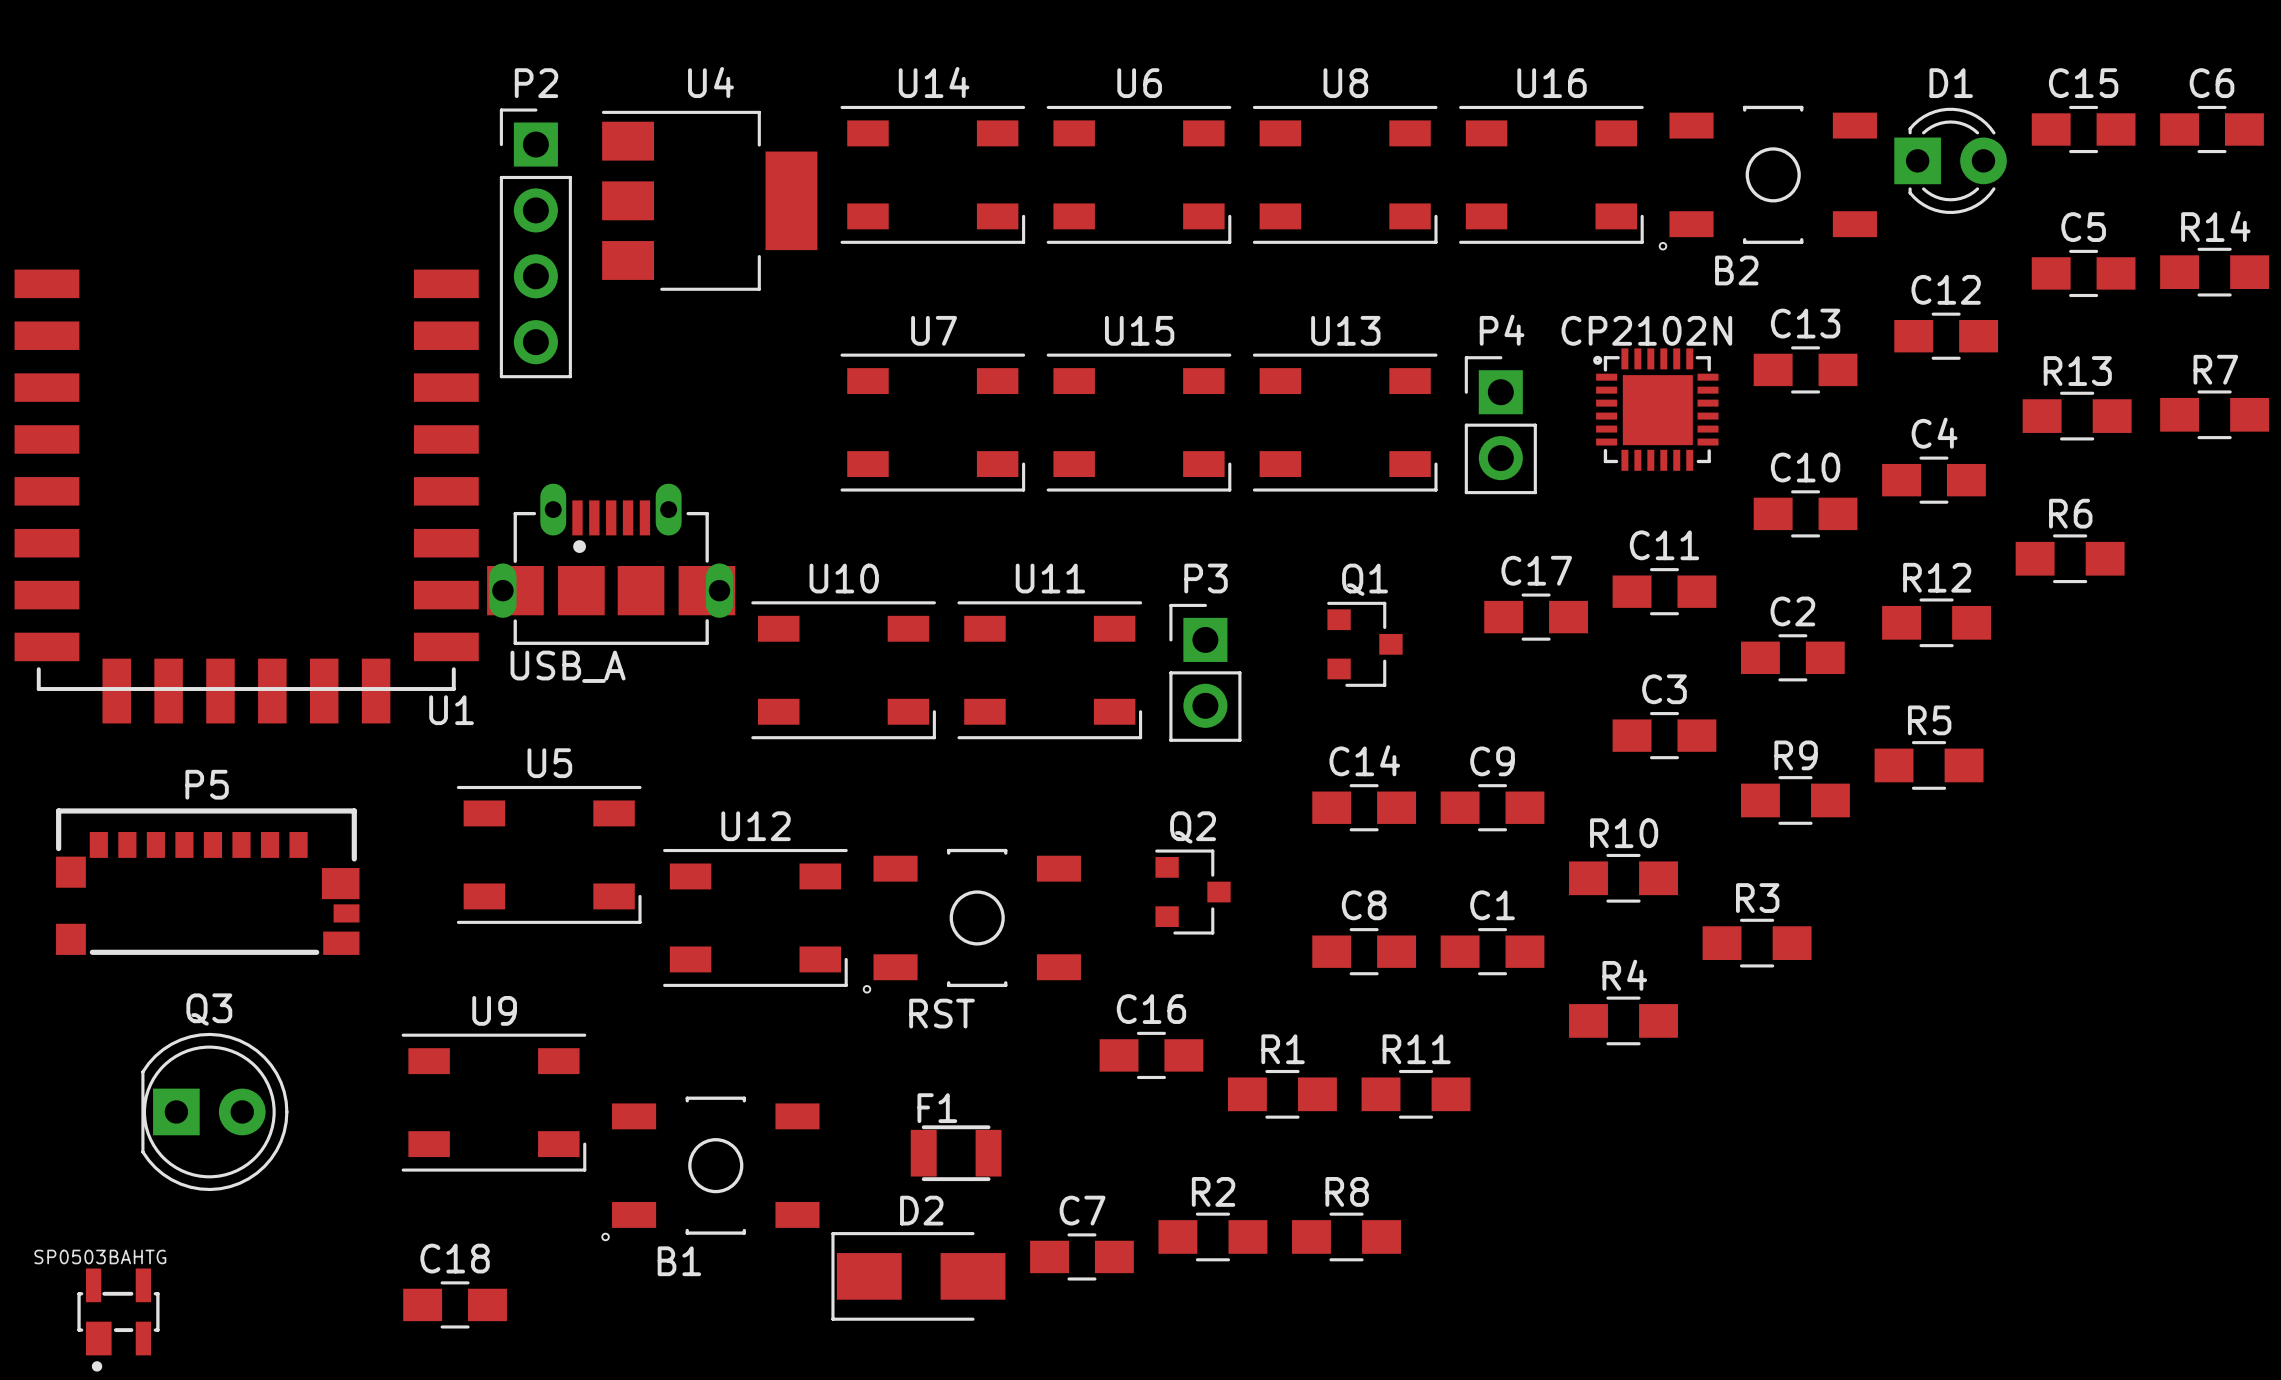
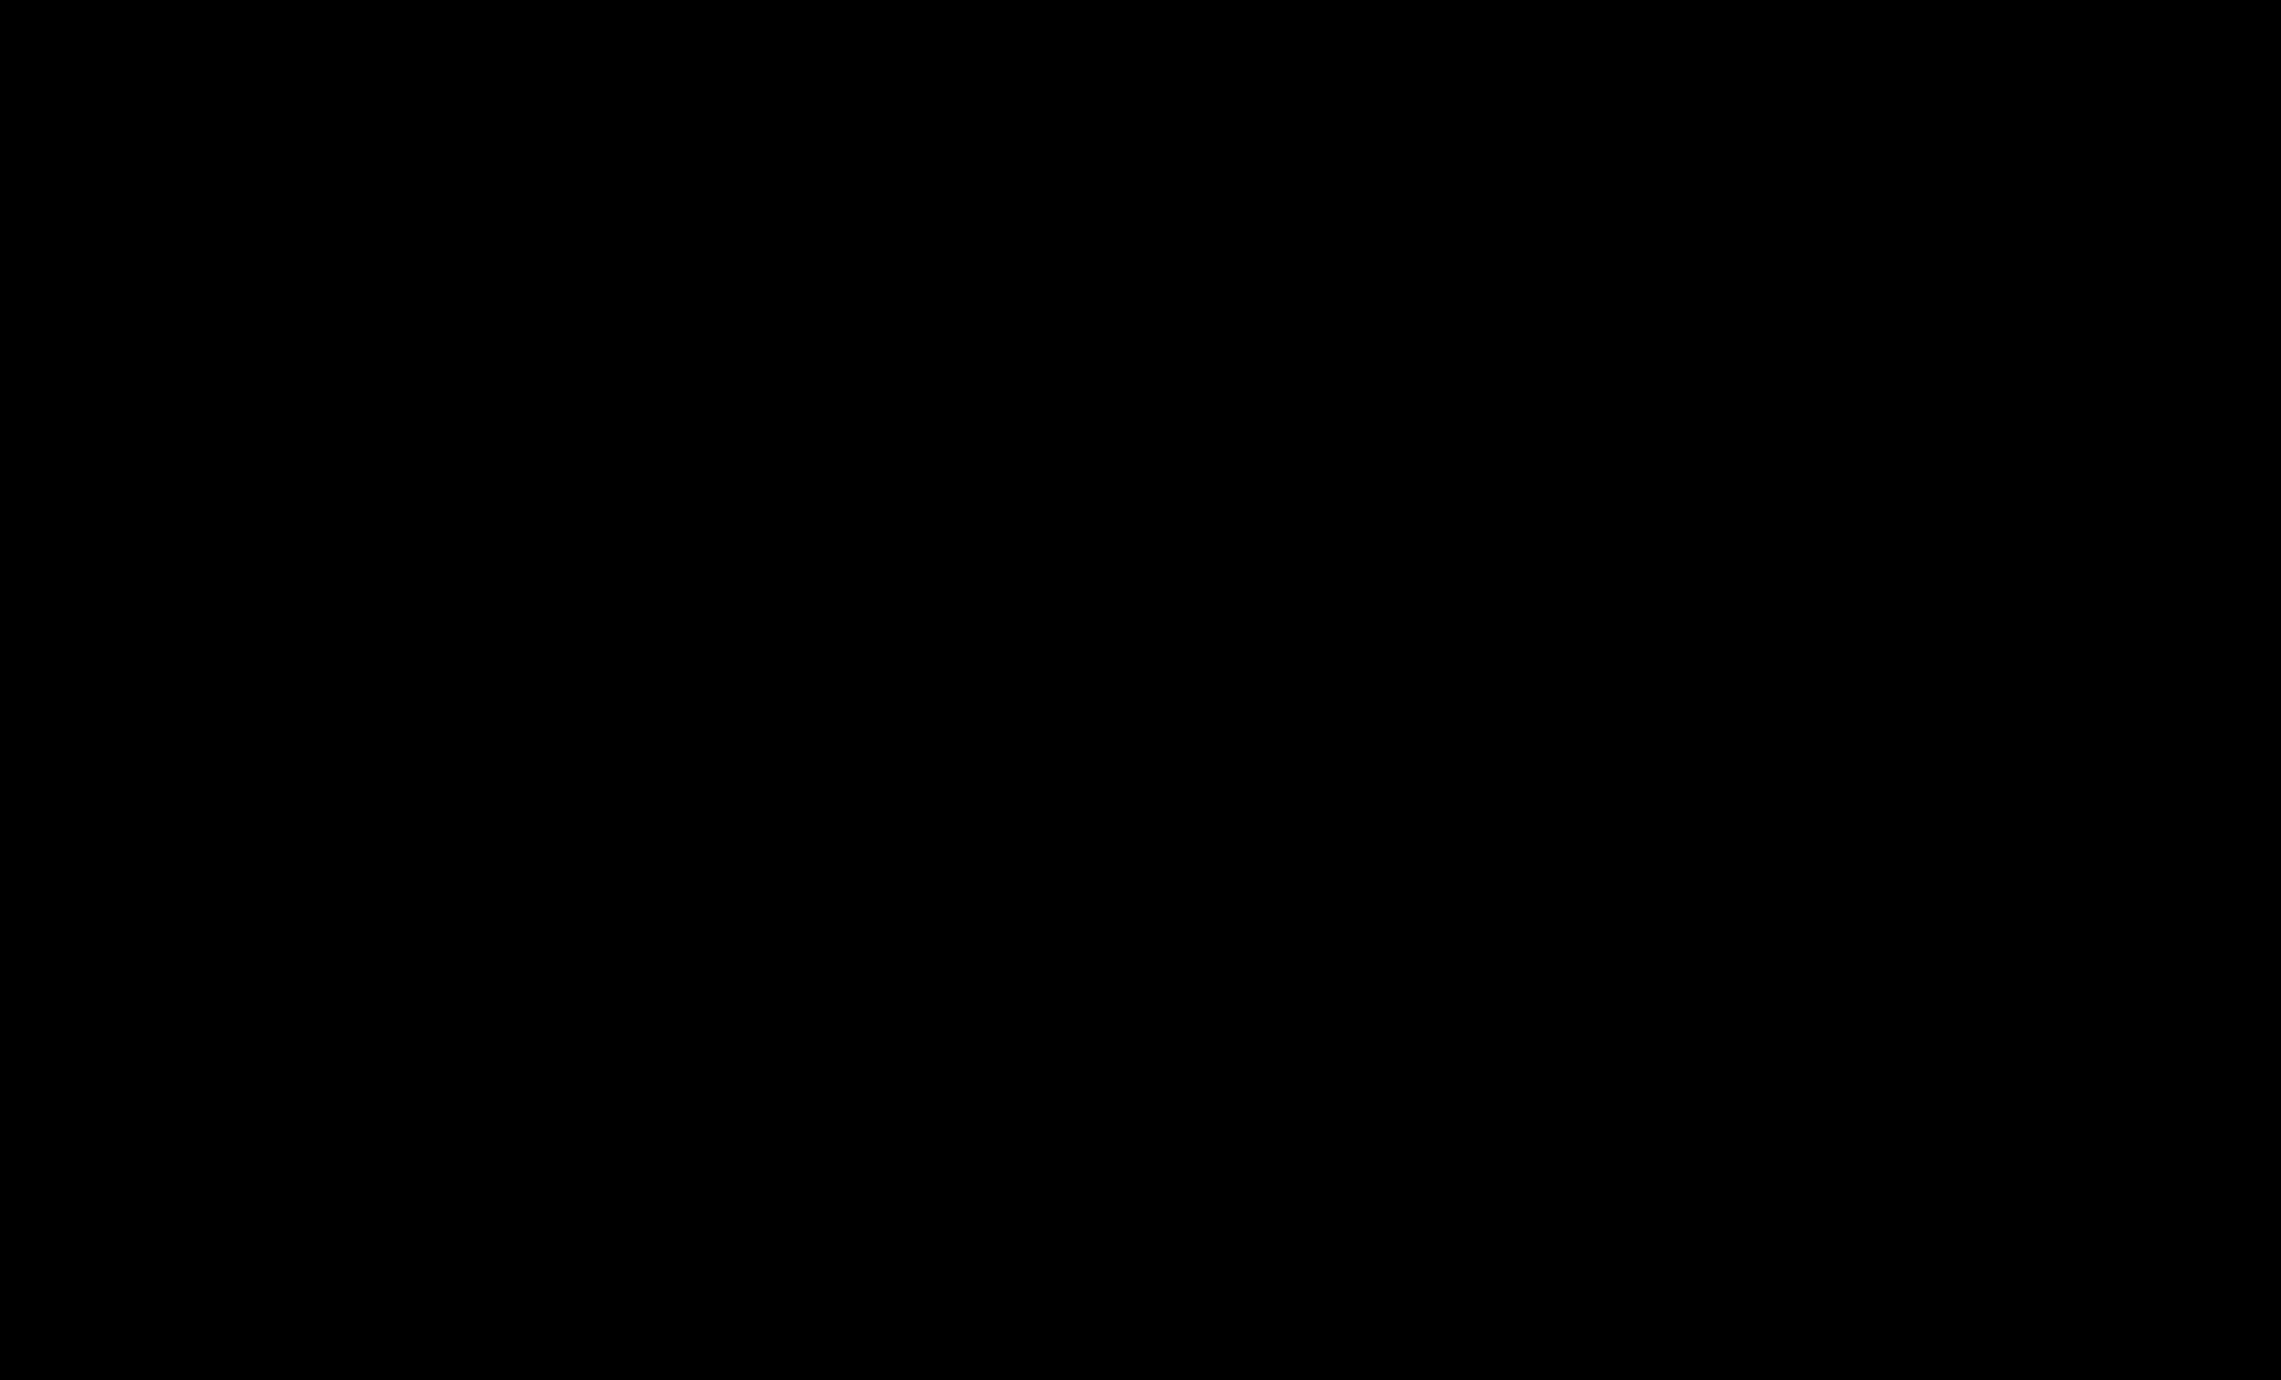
C15: (2083, 129) -> none
C6: (2212, 129) -> none
D1: (1950, 160) -> none
U14: (932, 174) -> none
U6: (1139, 174) -> none
U8: (1345, 174) -> none
U16: (1551, 174) -> none
part: B2 (1768, 177) -> none
U4: (709, 200) -> none
P2: (535, 243) -> none
R14: (2214, 272) -> none
C5: (2083, 273) -> none
C12: (1946, 336) -> none
C13: (1805, 369) -> none
part: CP2102N (1655, 409) -> none
R7: (2214, 414) -> none
R13: (2077, 416) -> none
U7: (932, 422) -> none
U15: (1139, 422) -> none
U13: (1345, 422) -> none
P4: (1500, 425) -> none
C4: (1933, 480) -> none
U1: (246, 496) -> none
C10: (1805, 513) -> none
R6: (2070, 558) -> none
part: USB_A (611, 564) -> none
C11: (1664, 591) -> none
C17: (1536, 617) -> none
R12: (1936, 622) -> none
Q1: (1364, 644) -> none
C2: (1792, 657) -> none
U10: (843, 670) -> none
U11: (1049, 670) -> none
P3: (1205, 672) -> none
C3: (1664, 735) -> none
R5: (1929, 765) -> none
R9: (1795, 800) -> none
C14: (1364, 807) -> none
C9: (1492, 807) -> none
U5: (549, 854) -> none
R10: (1623, 878) -> none
P5: (207, 881) -> none
Q2: (1192, 892) -> none
U12: (755, 917) -> none
part: RST (972, 920) -> none
R3: (1757, 943) -> none
C8: (1364, 951) -> none
C1: (1492, 951) -> none
R4: (1623, 1020) -> none
C16: (1151, 1055) -> none
R1: (1282, 1094) -> none
R11: (1416, 1094) -> none
U9: (493, 1102) -> none
Q3: (214, 1111) -> none
F1: (956, 1153) -> none
part: B1 (710, 1168) -> none
R2: (1212, 1236) -> none
R8: (1346, 1236) -> none
C7: (1081, 1256) -> none
D2: (918, 1276) -> none
C18: (455, 1304) -> none
part: SP0503BAHTG (118, 1320) -> none

